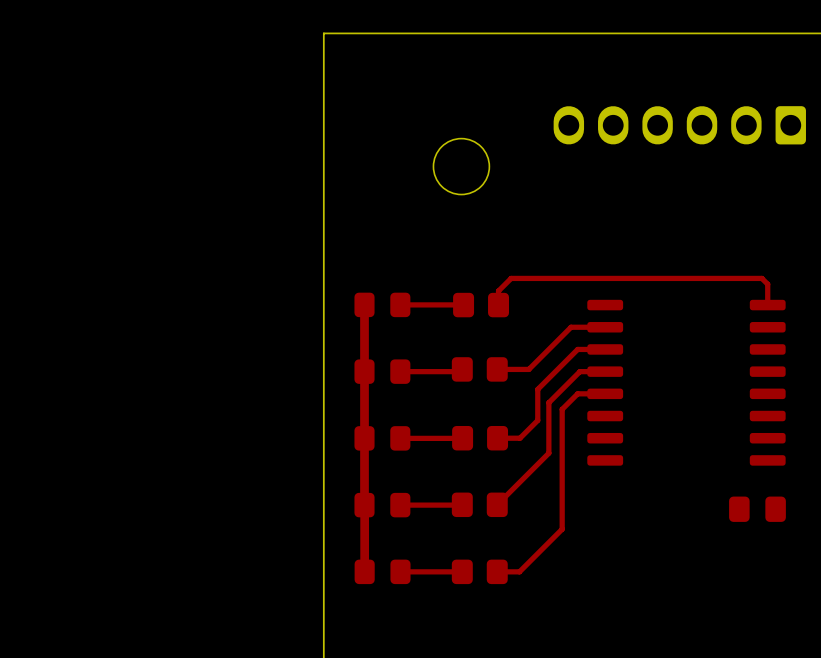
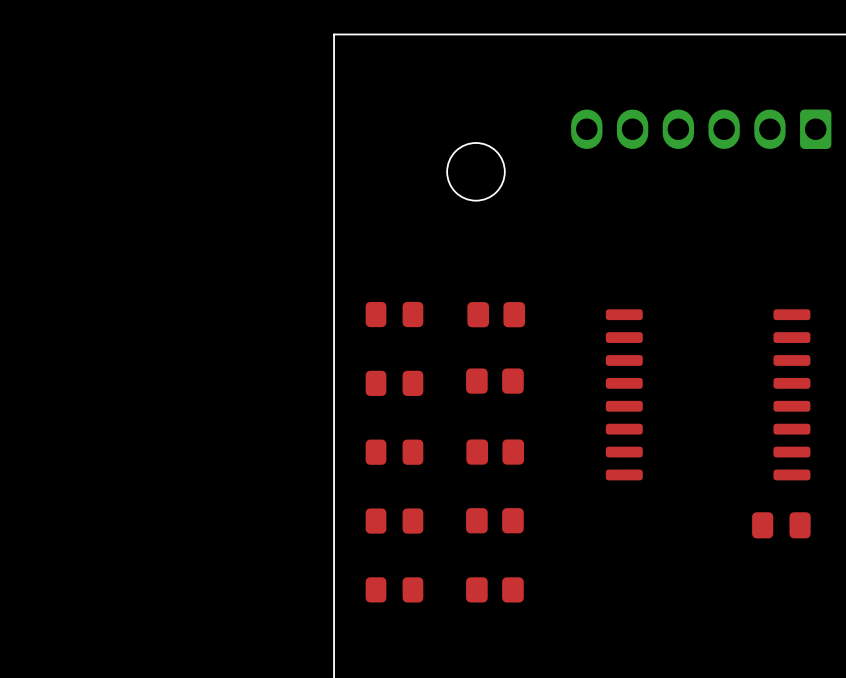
top track: (362, 304) (364, 307) (363, 505) -> none
top track: (400, 304) (463, 305) -> none
top track: (767, 305) (767, 284) (761, 278) (511, 278) (498, 291) (498, 305) -> none
top track: (605, 327) (571, 327) (528, 369) (497, 369) -> none
top track: (605, 349) (577, 349) (537, 389) (537, 420) (520, 438) (497, 438) -> none
top track: (400, 371) (462, 372) -> none
top track: (605, 371) (579, 371) (548, 402) (548, 453) (497, 504) -> none
top track: (605, 393) (577, 393) (562, 409) (562, 529) (519, 571) (497, 571) -> none
top track: (462, 436) (459, 438) (400, 438) -> none
top track: (364, 505) (364, 571) -> none
top track: (462, 505) (400, 505) -> none
top track: (462, 571) (400, 571) -> none

